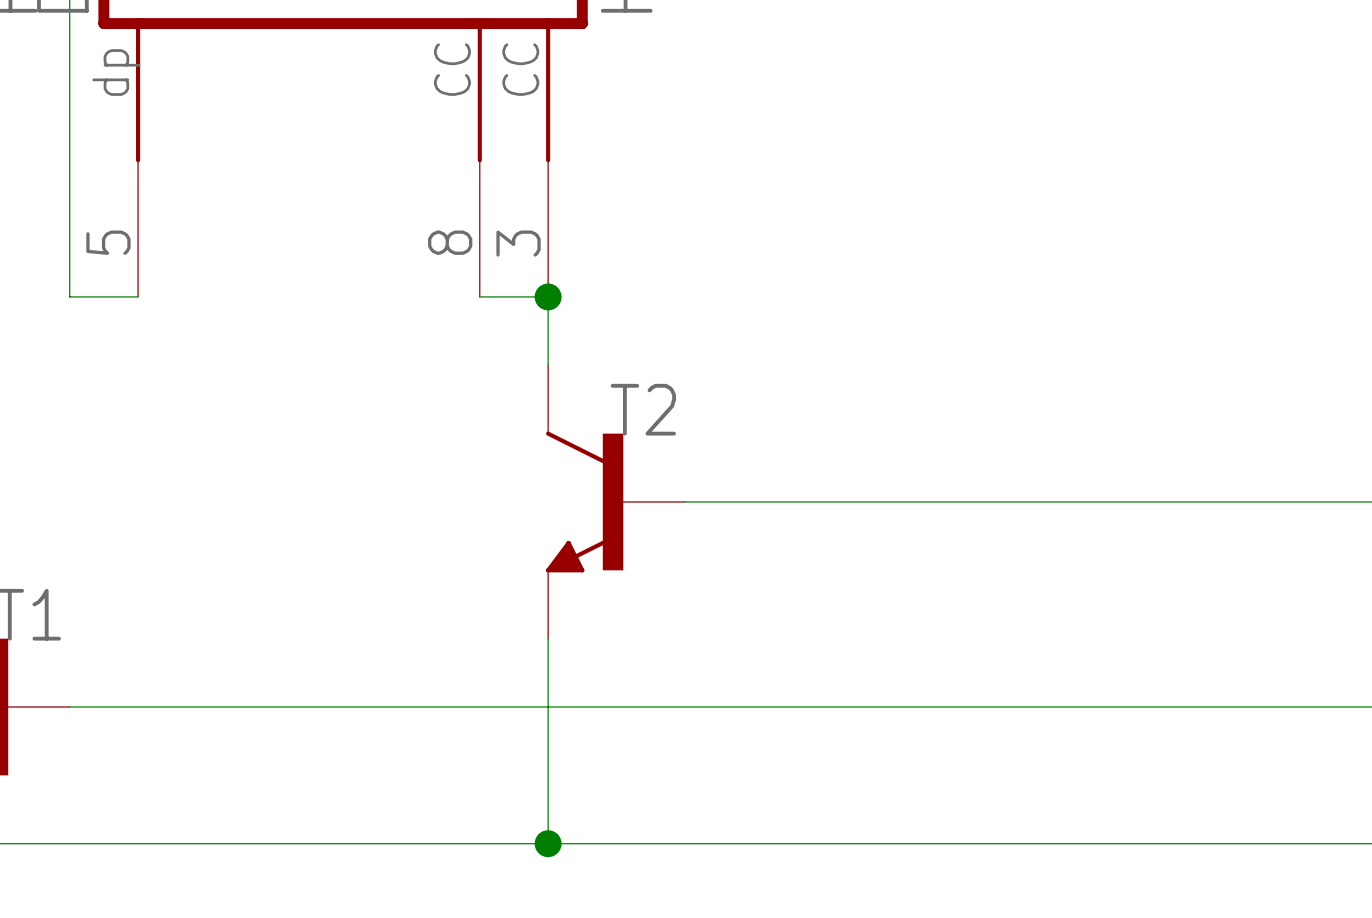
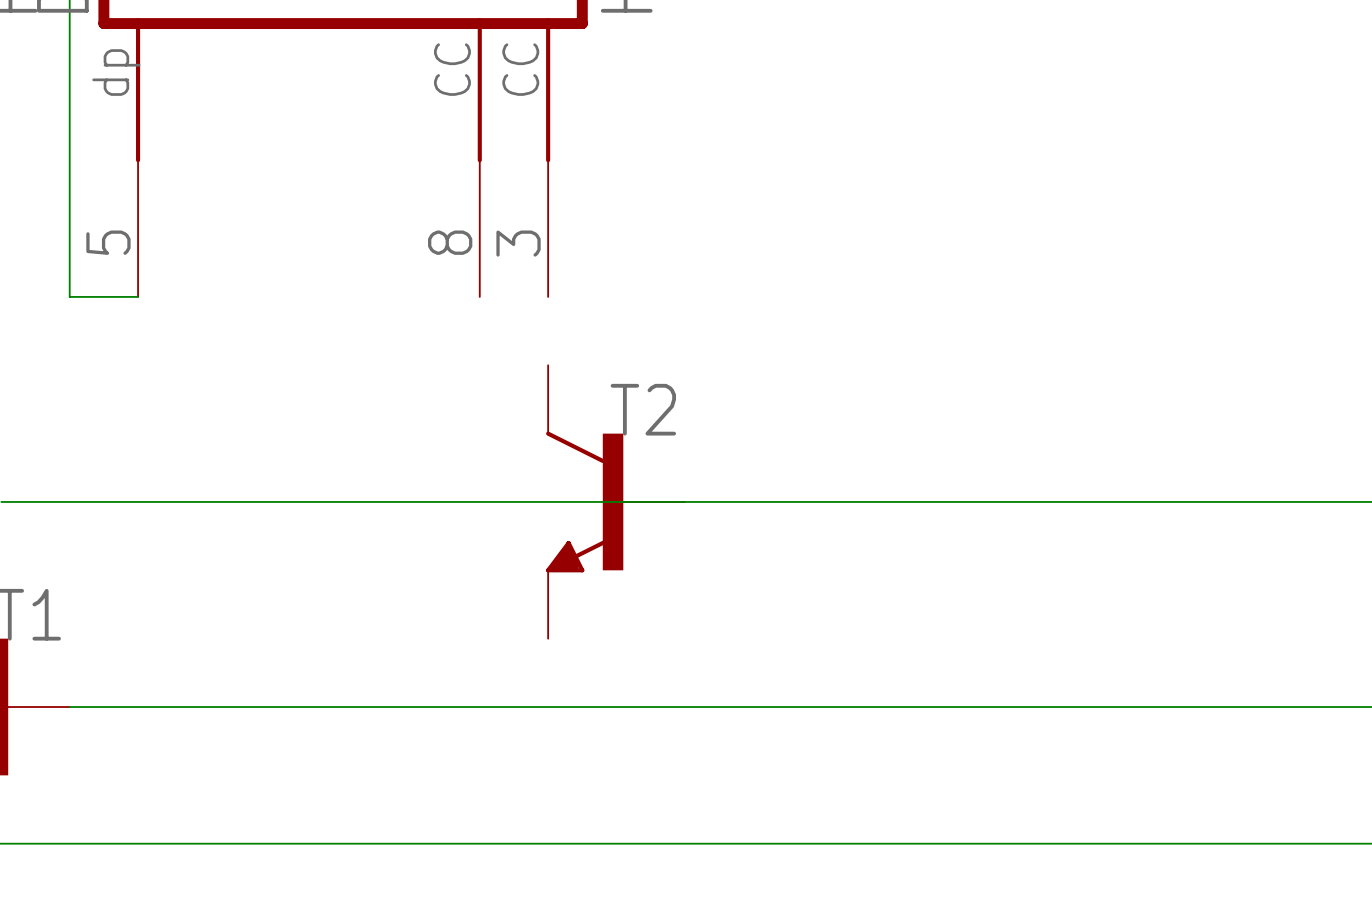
wire: (479, 296) (548, 296) (548, 365) -> none
junction: (548, 296) -> none
wire: none -> (1, 501) (684, 501)
wire: (548, 638) (548, 843) -> none
junction: (548, 843) -> none

